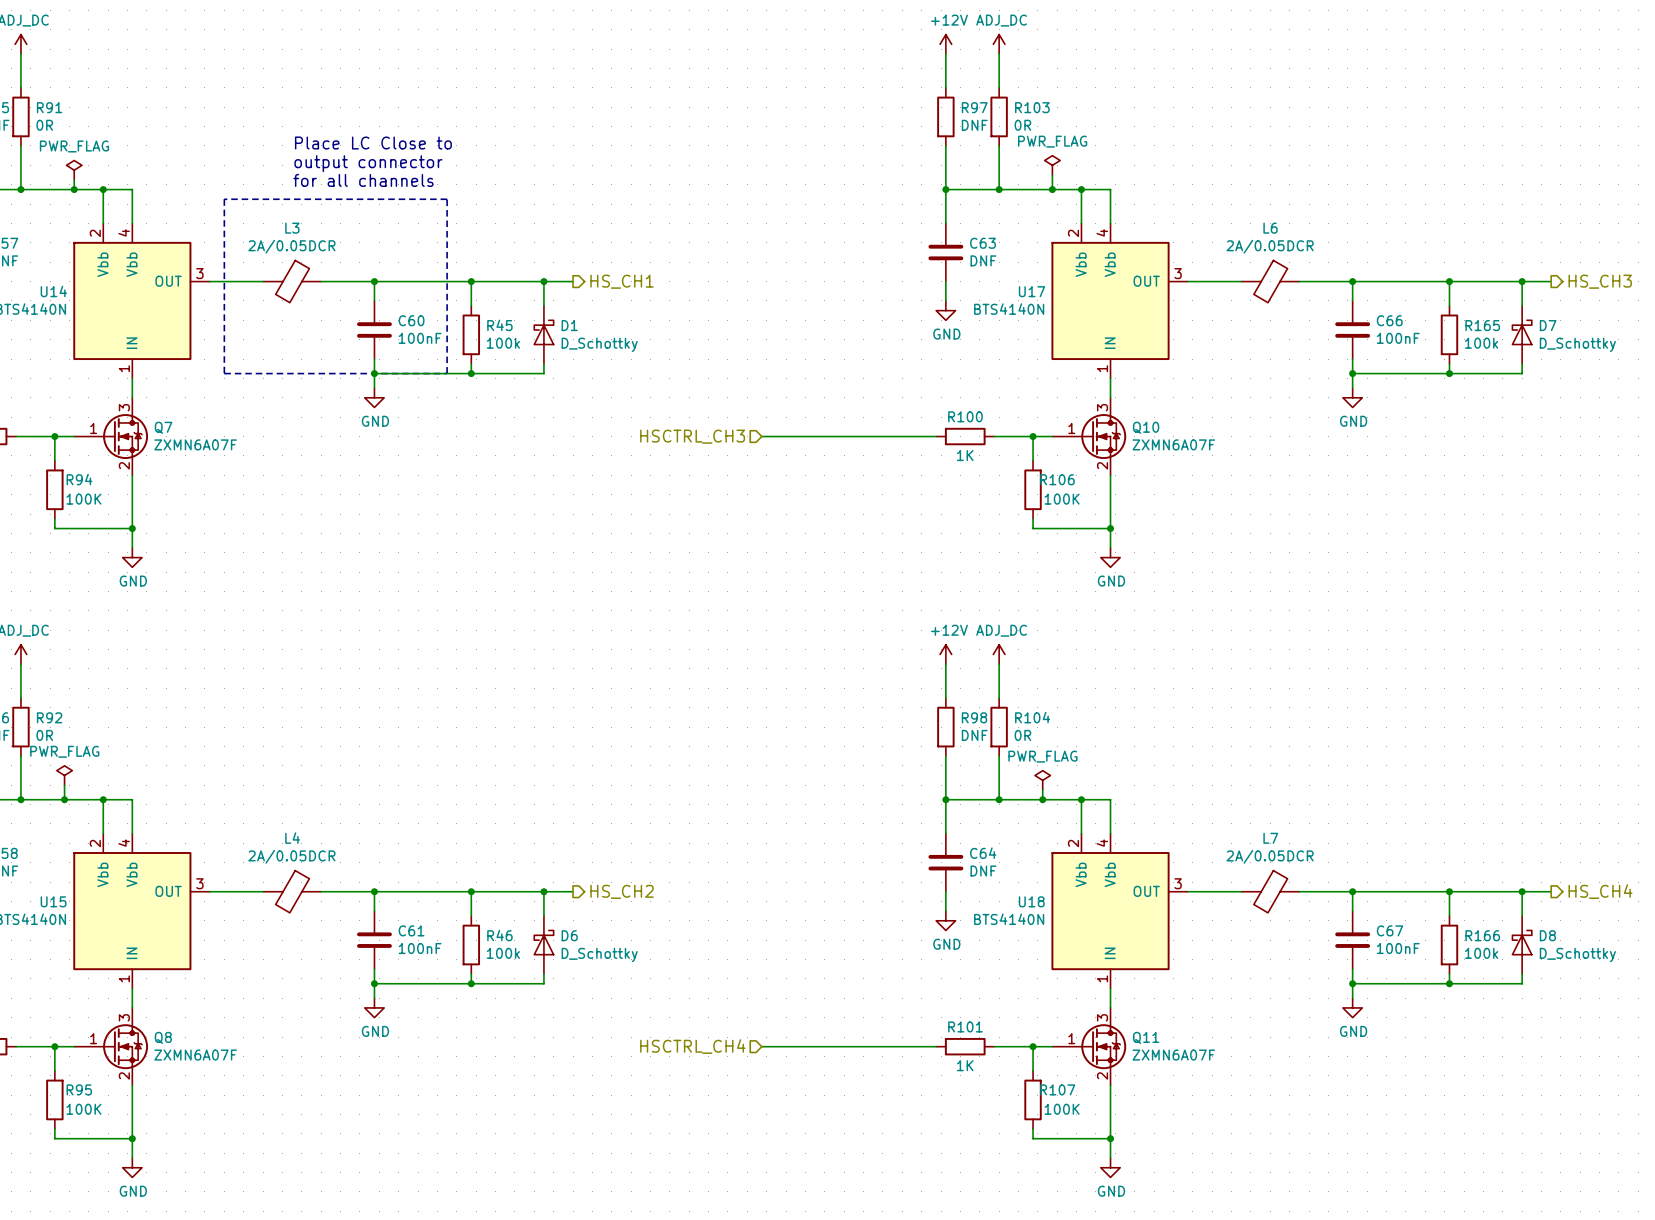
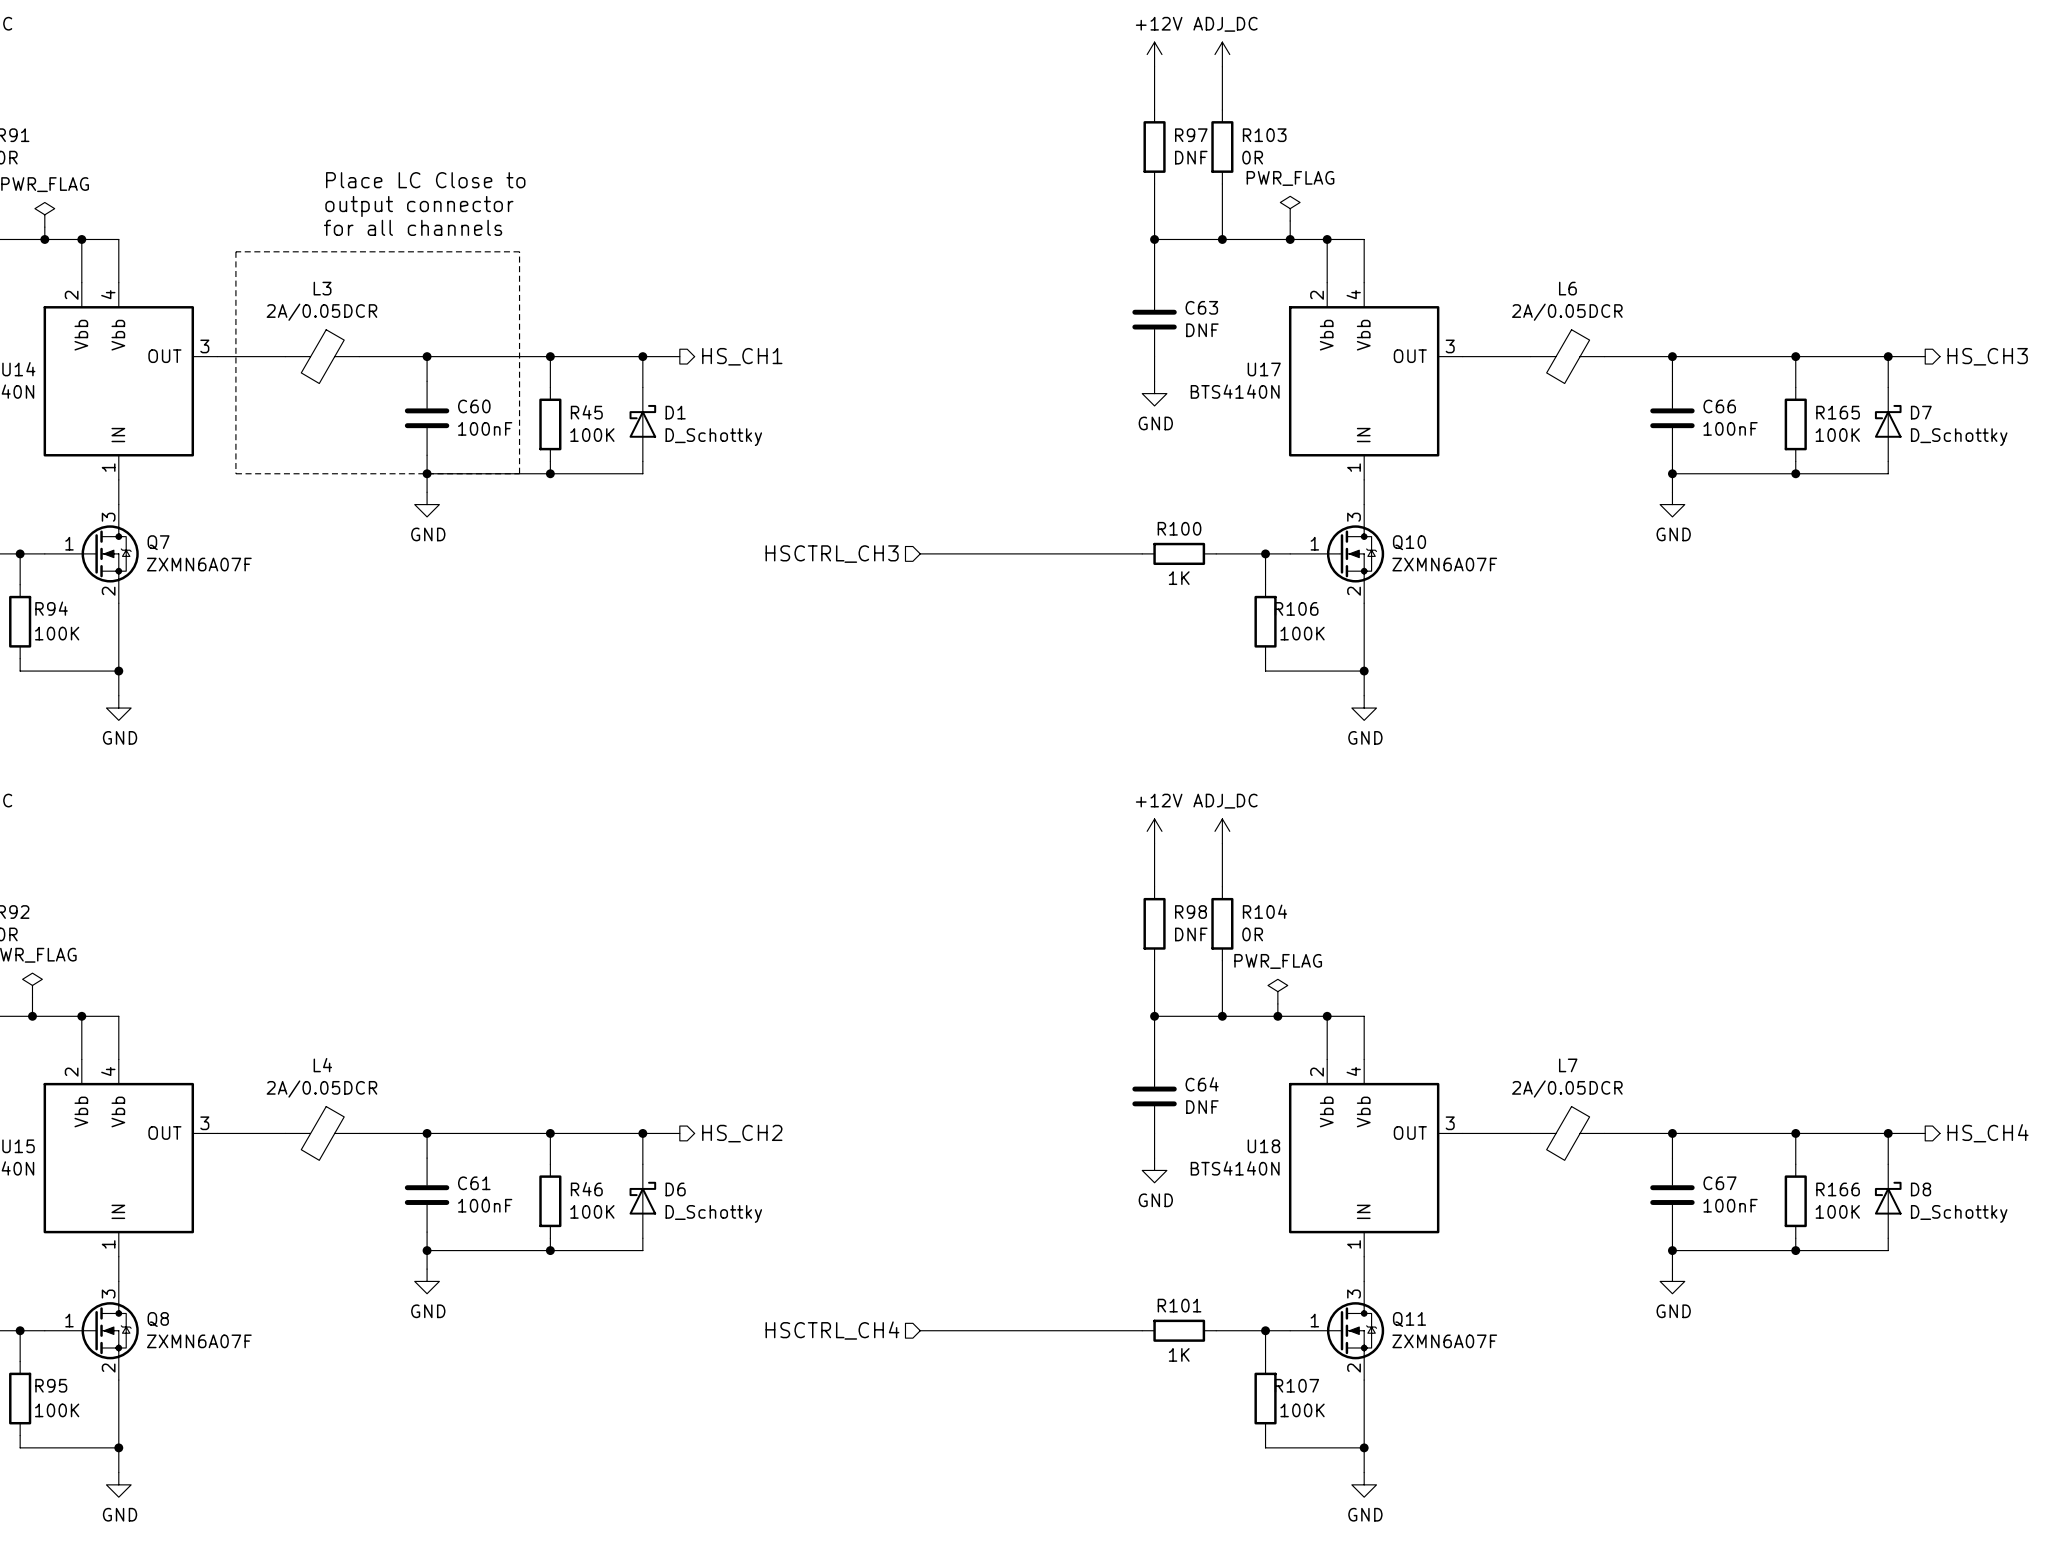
R45 value: 100k (503, 343) -> 100K (592, 435)
R165 value: 100k (1481, 343) -> 100K (1837, 435)
R46 value: 100k (503, 953) -> 100K (592, 1211)
R166 value: 100k (1481, 953) -> 100K (1837, 1211)

